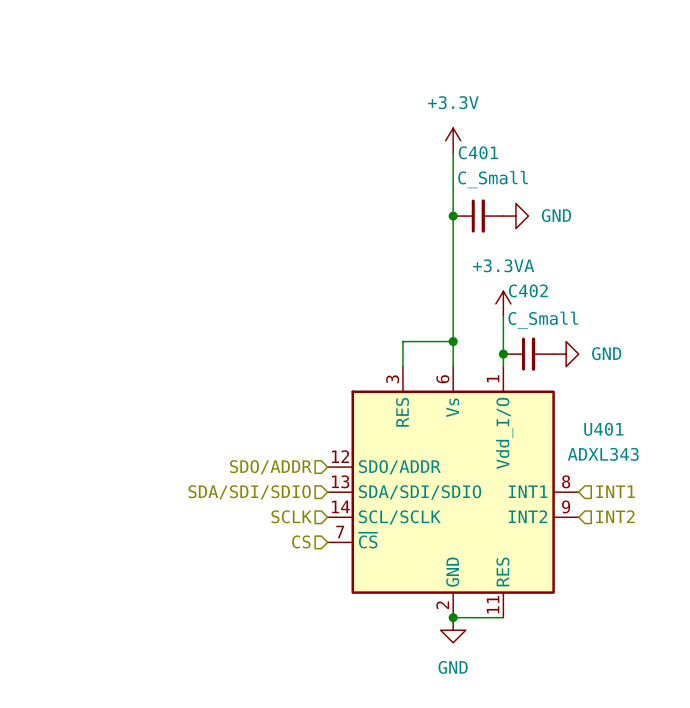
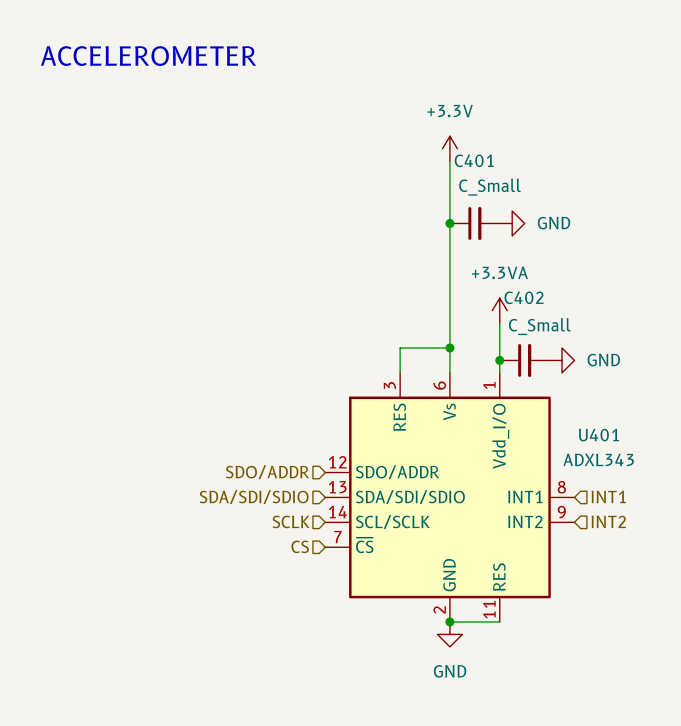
text: none -> ACCELEROMETER (148, 56)

